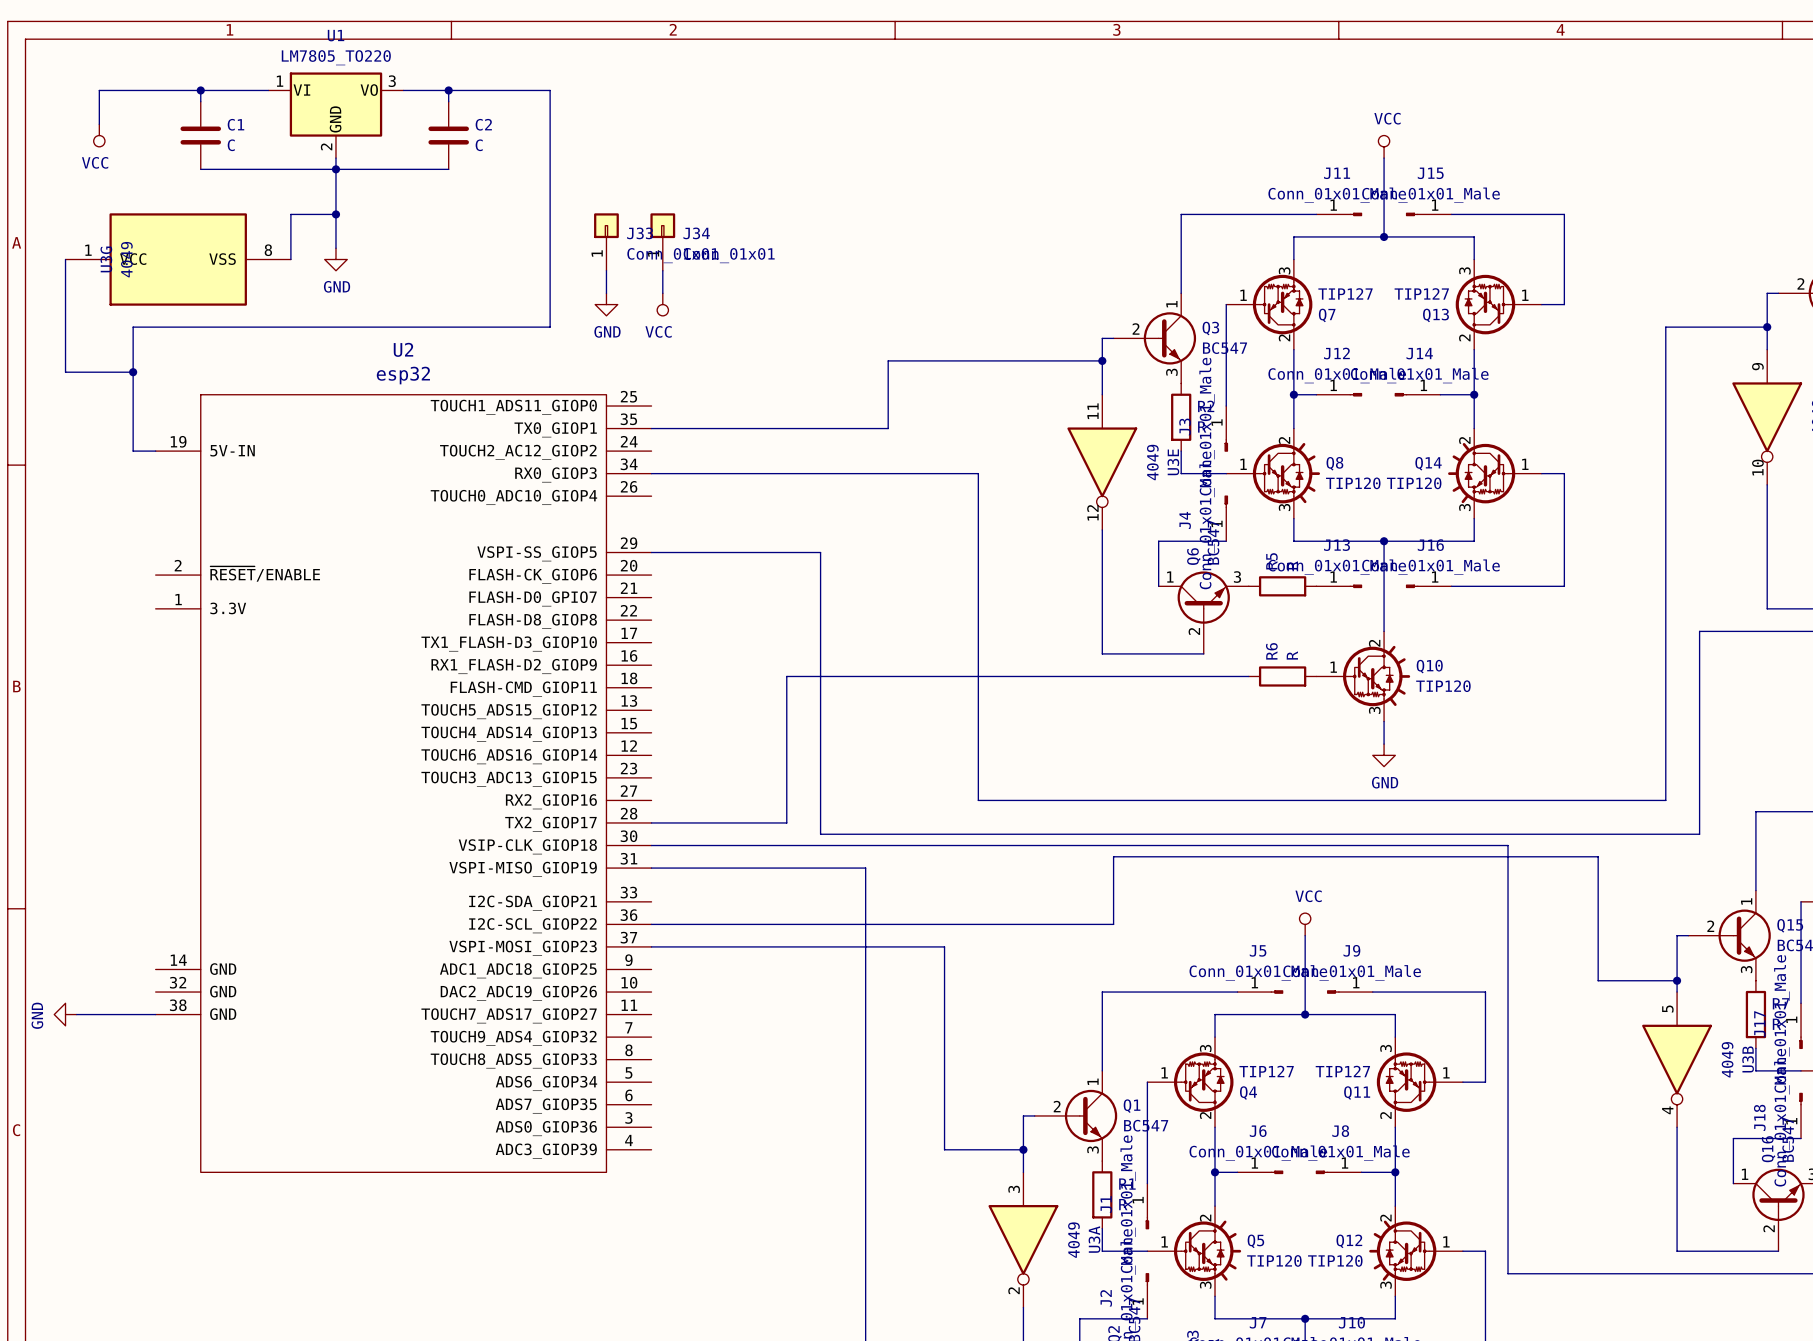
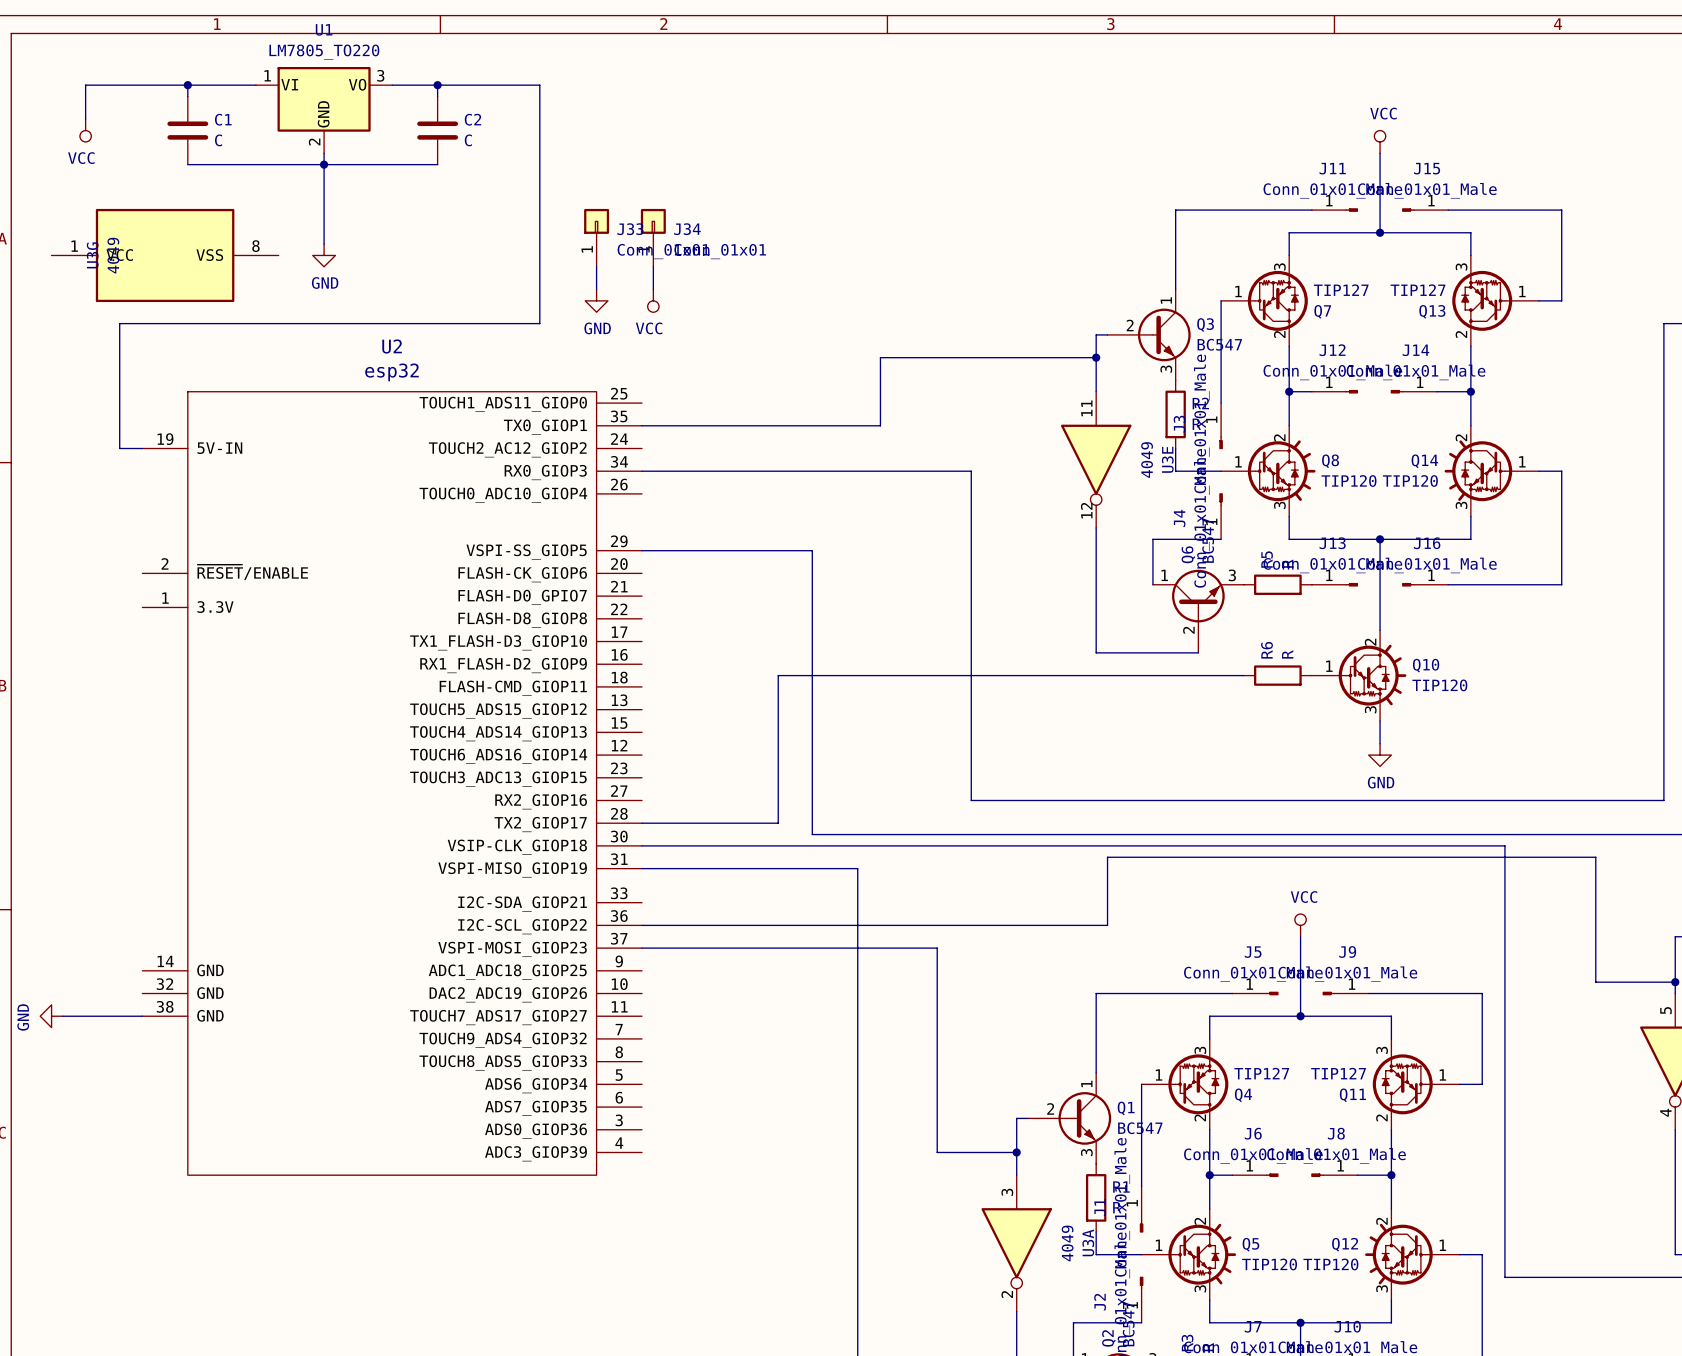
wire: (335, 214) (290, 214) (290, 259) -> none
junction: (335, 214) -> none
wire: (65, 259) (65, 372) (133, 372) -> none
junction: (133, 372) -> none

